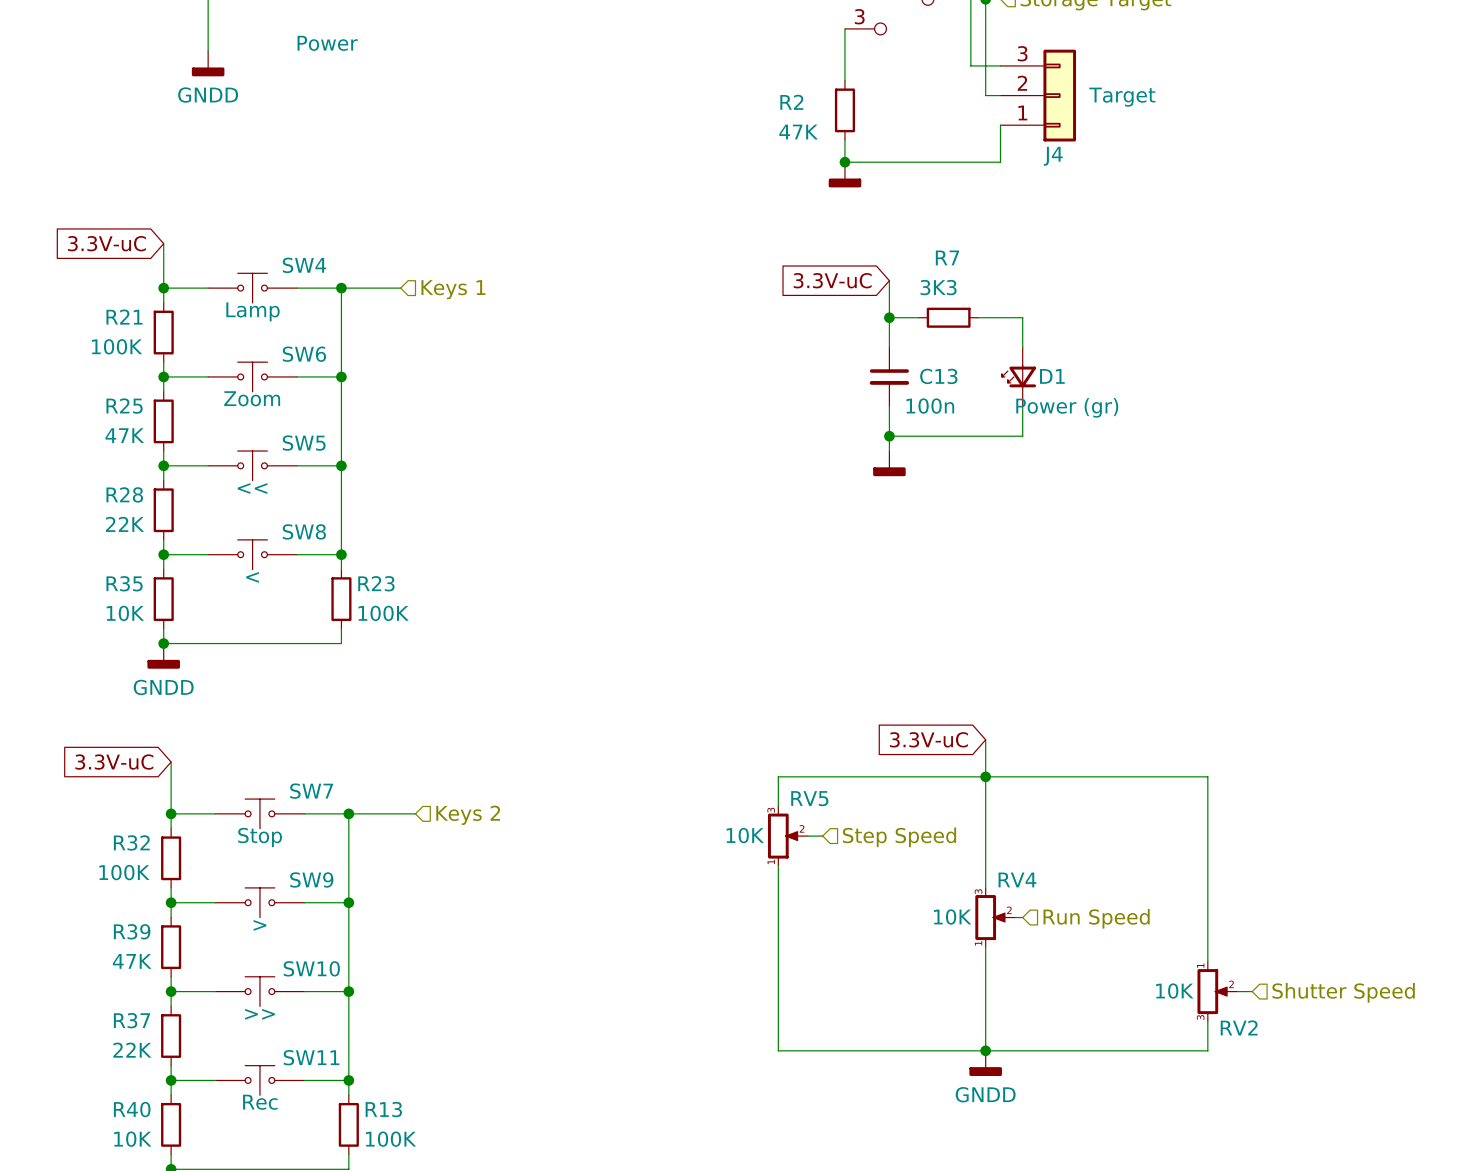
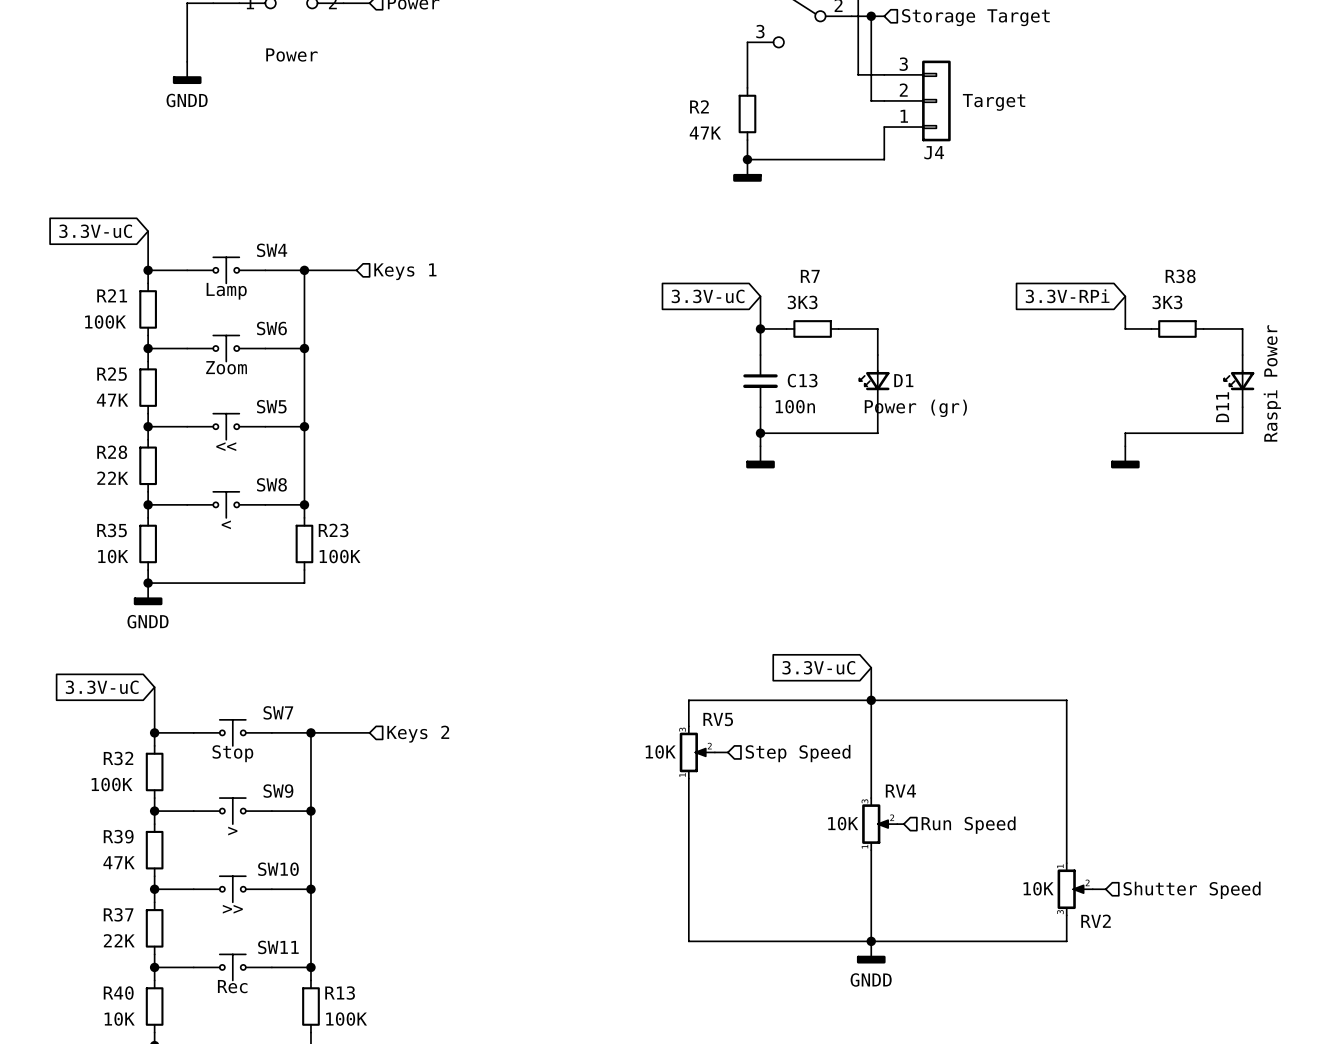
global label position: 3.3V-uC (832, 280) -> 3.3V-uC (708, 296)
wire: (889, 280) (889, 347) -> (760, 296) (760, 355)
wire: (889, 317) (919, 317) -> (760, 328) (786, 328)
junction: (889, 317) -> none
R7 position: (948, 317) -> (812, 328)
wire: (978, 317) (1022, 317) (1022, 347) -> (838, 328) (877, 328) (877, 355)
global label: none -> 3.3V-RPi (1067, 296)
wire: none -> (1125, 296) (1125, 328) (1151, 328)
junction: none -> (760, 328)
R38: none -> 3K3 (1177, 328)
wire: none -> (1203, 328) (1242, 328) (1242, 355)
C13 position: (889, 376) -> (760, 381)
D1 position: (1018, 376) -> (874, 381)
wire: (889, 406) (889, 451) -> (760, 407) (760, 446)
wire: (1022, 406) (1022, 436) (889, 436) -> (877, 407) (877, 433) (760, 433)
D11: none -> Raspi Power (1239, 381)
junction: (889, 436) -> none
wire: none -> (1242, 407) (1242, 433) (1125, 433) (1125, 446)
power symbol position: (889, 463) -> (760, 457)
junction: none -> (760, 433)
power symbol: none -> (1125, 457)

